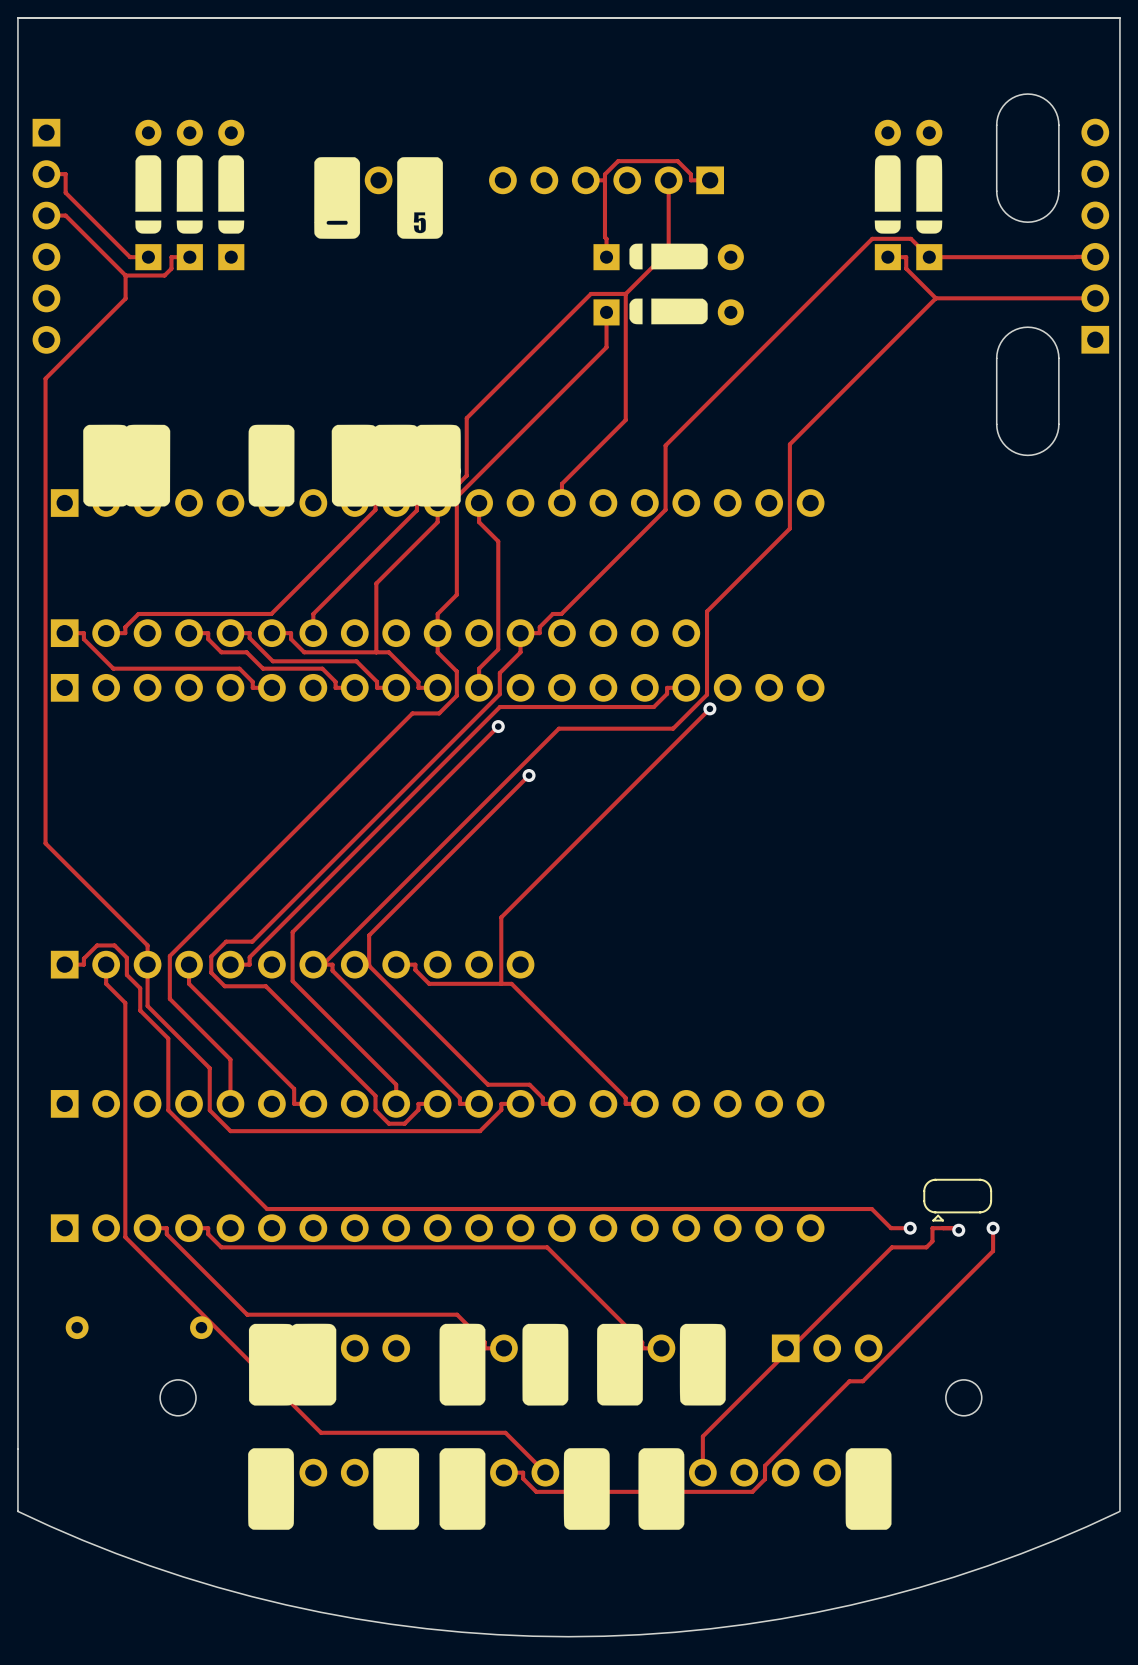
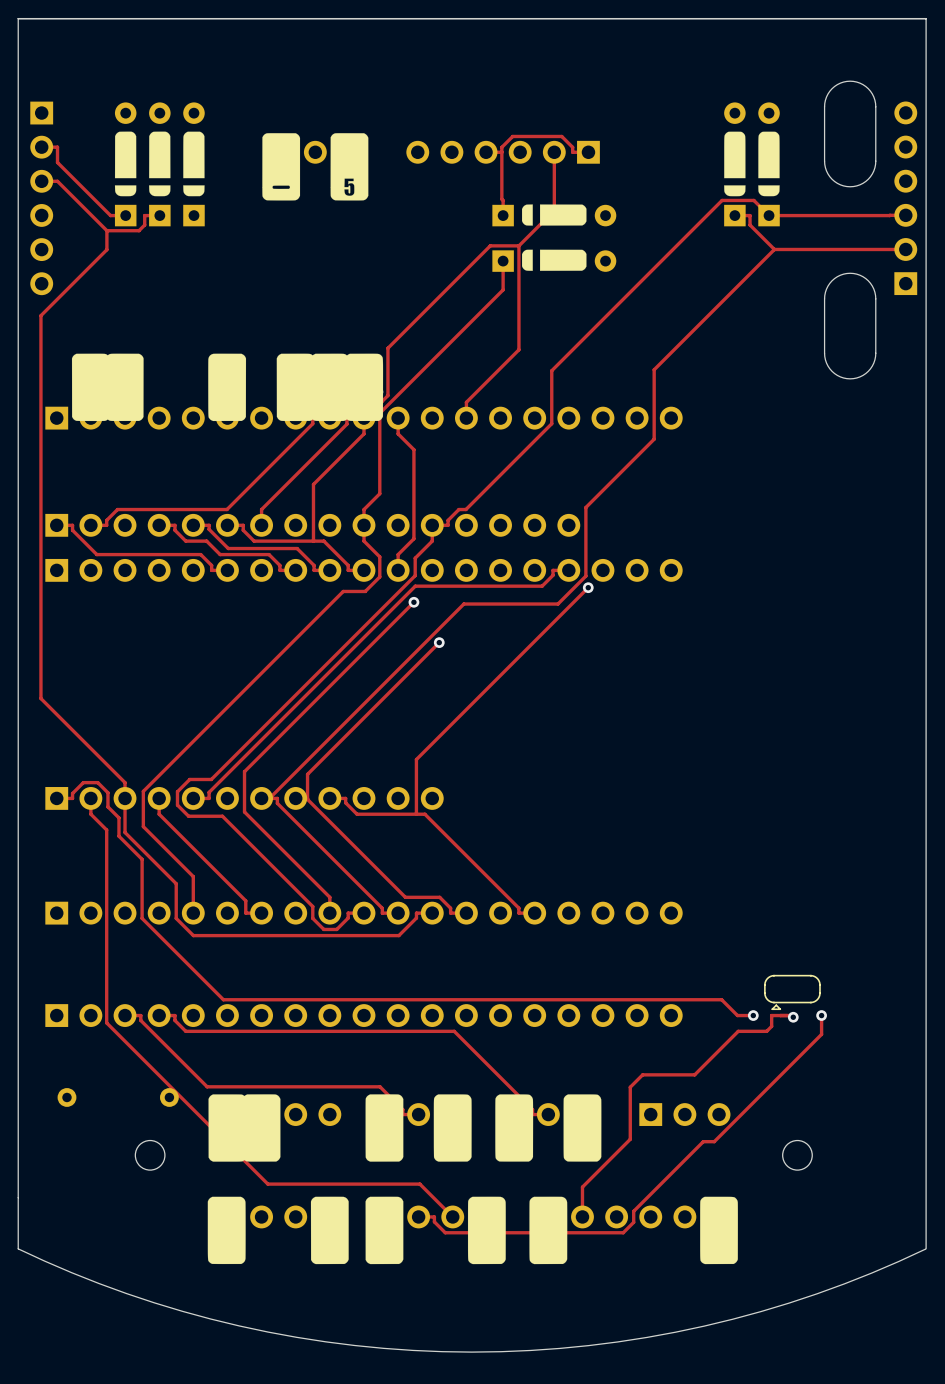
track: (839, 1300) (760, 1378) -> (694, 1074) (642, 1074) (630, 1087) (630, 1139)

